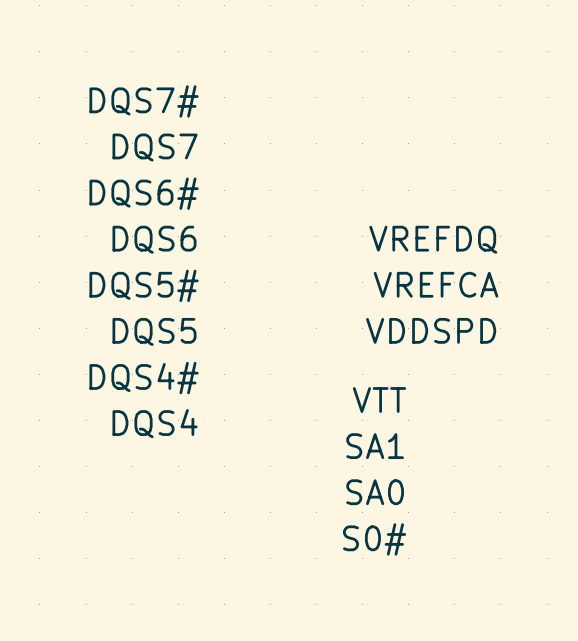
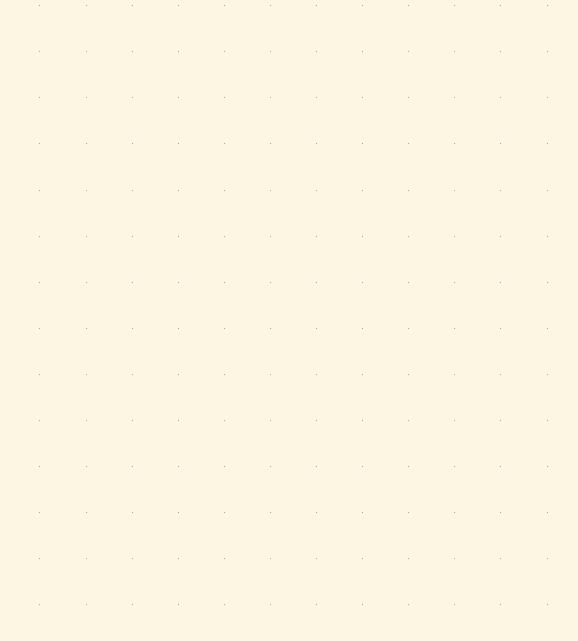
label: DQS7# (144, 101) -> none
label: DQS7 (155, 147) -> none
label: DQS6# (144, 193) -> none
label: DQS6 (154, 239) -> none
label: VREFDQ (433, 239) -> none
label: VREFCA (436, 284) -> none
label: DQS5# (144, 285) -> none
label: VDDSPD (431, 330) -> none
label: DQS5 (154, 331) -> none
label: DQS4# (144, 378) -> none
label: VTT (379, 400) -> none
label: DQS4 (155, 423) -> none
label: SA1 (375, 446) -> none
label: SA0 (375, 492) -> none
label: S0# (374, 539) -> none

